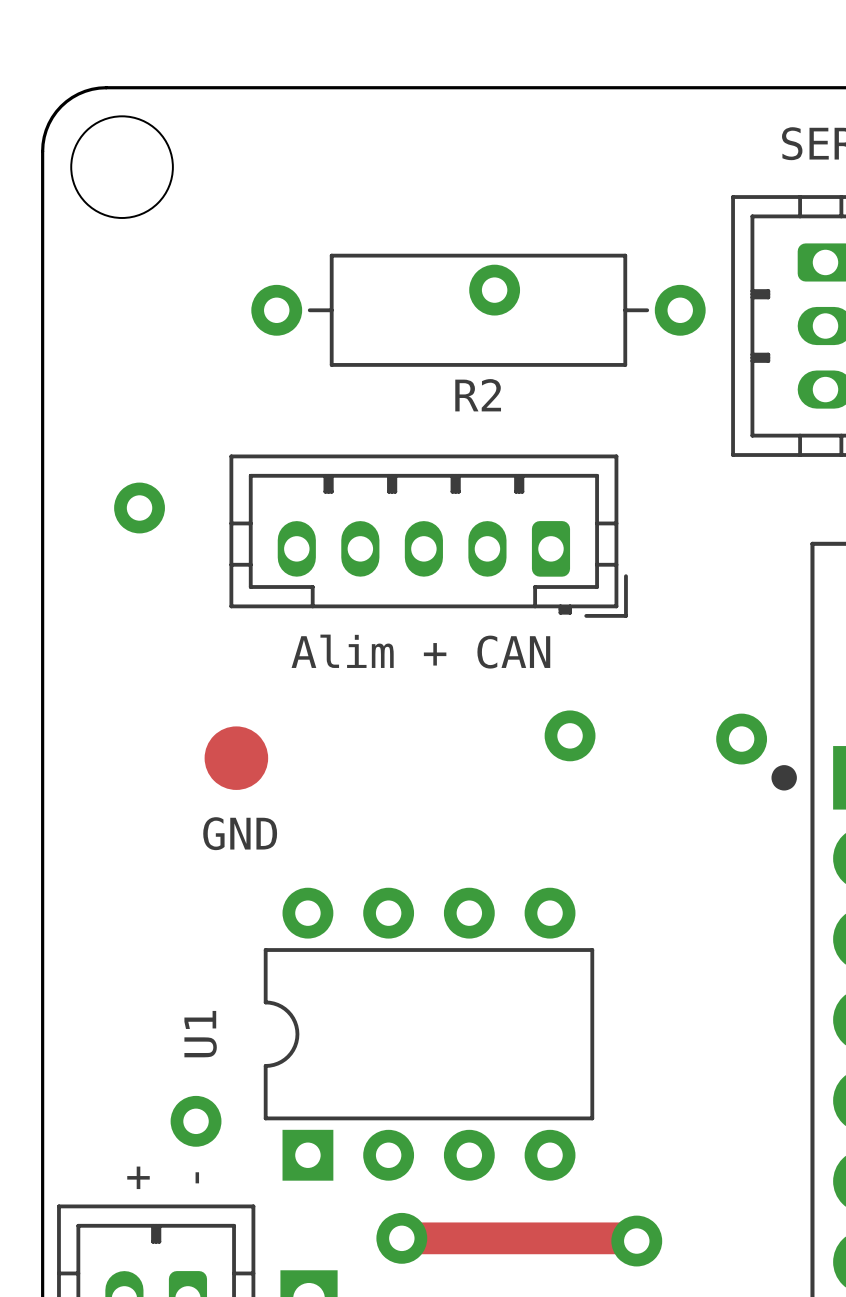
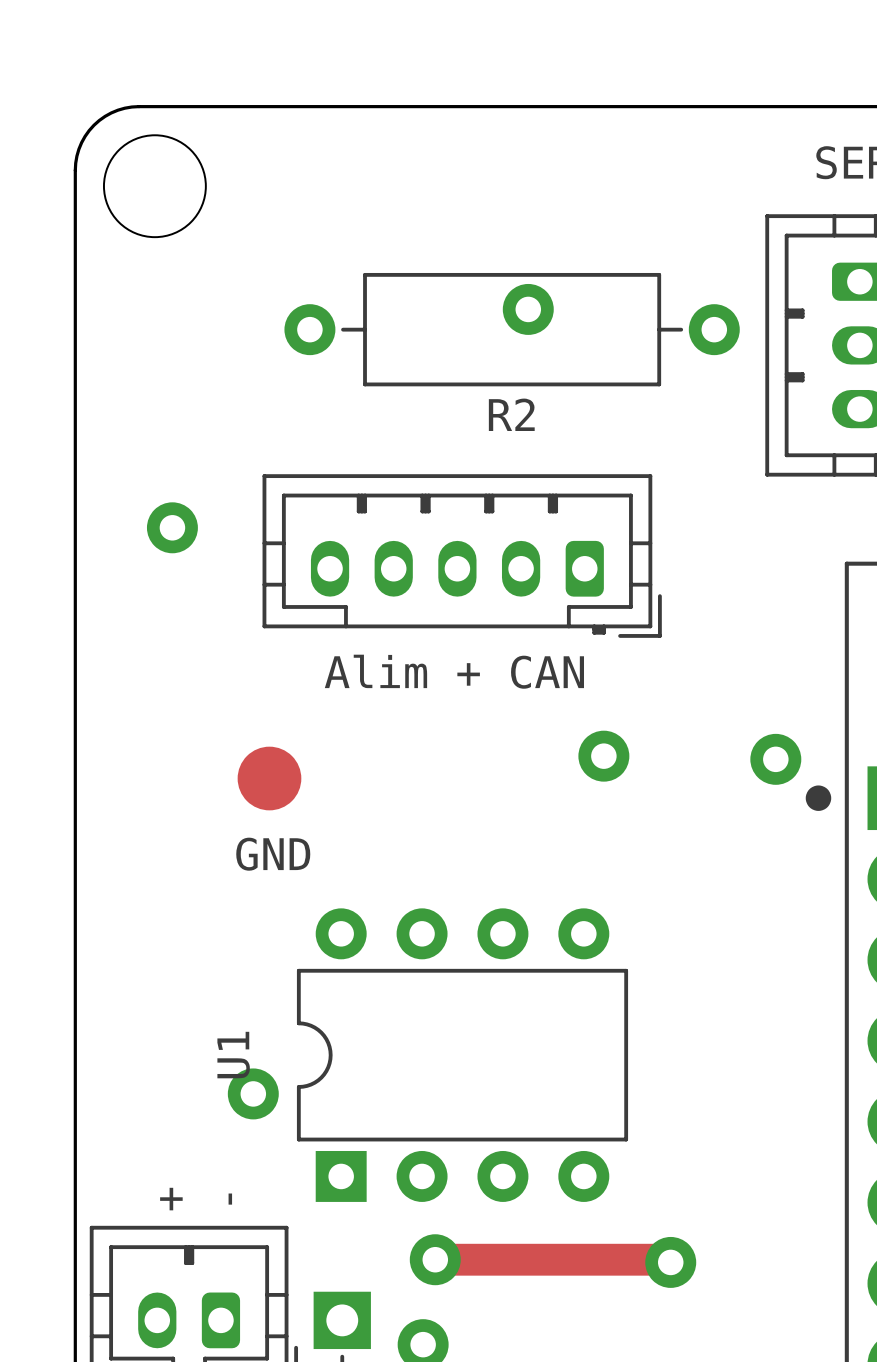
via position: (196, 1121) -> (253, 1093)

